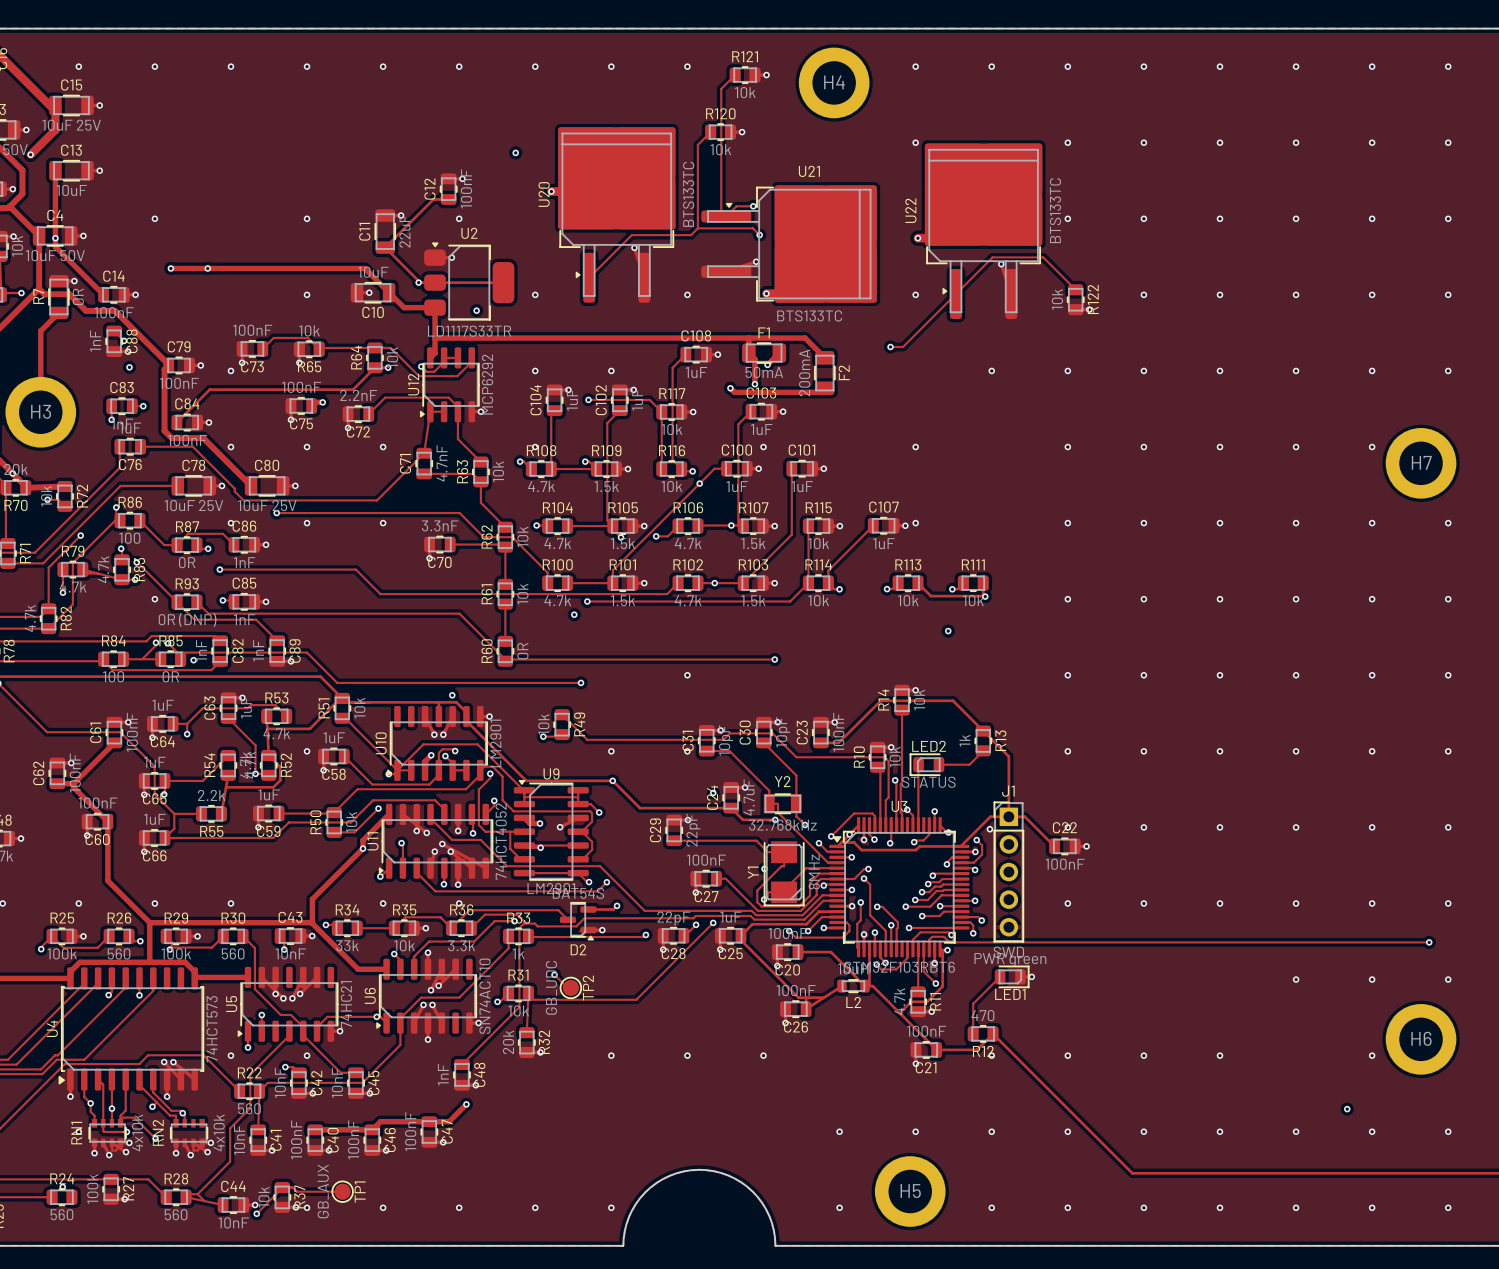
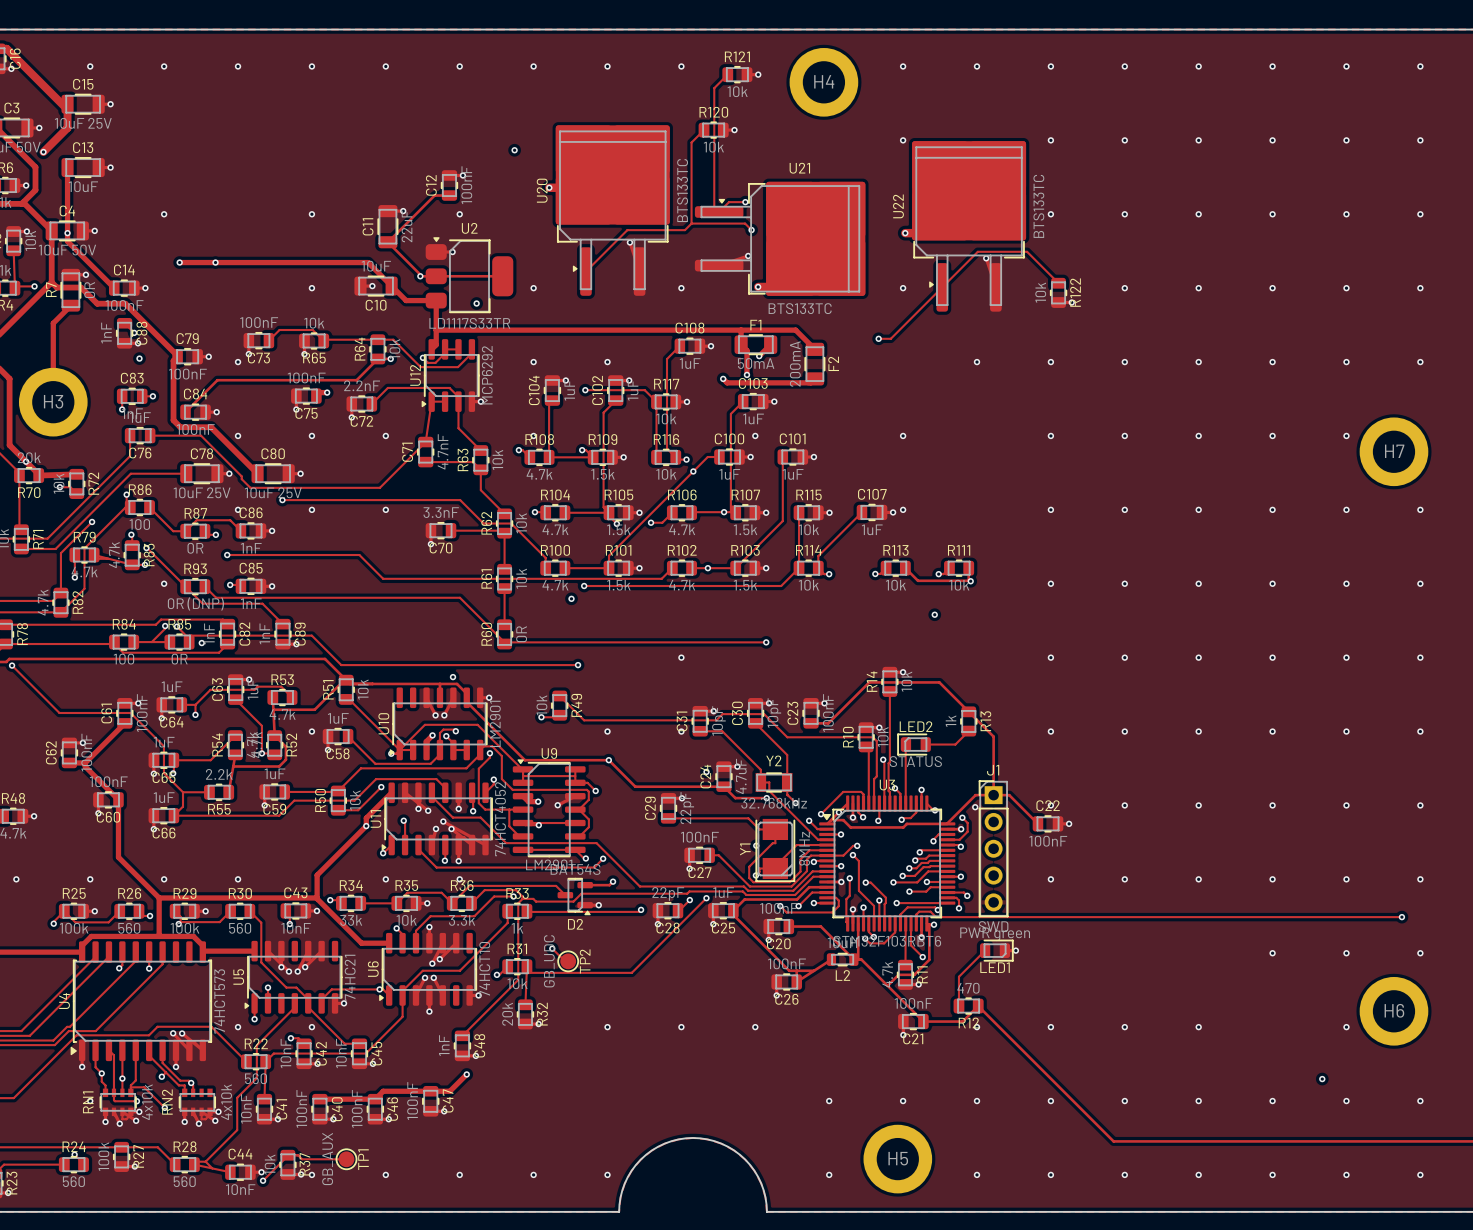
U6 value: SN74ACT10 (484, 996) -> 74HCT10 (484, 969)

